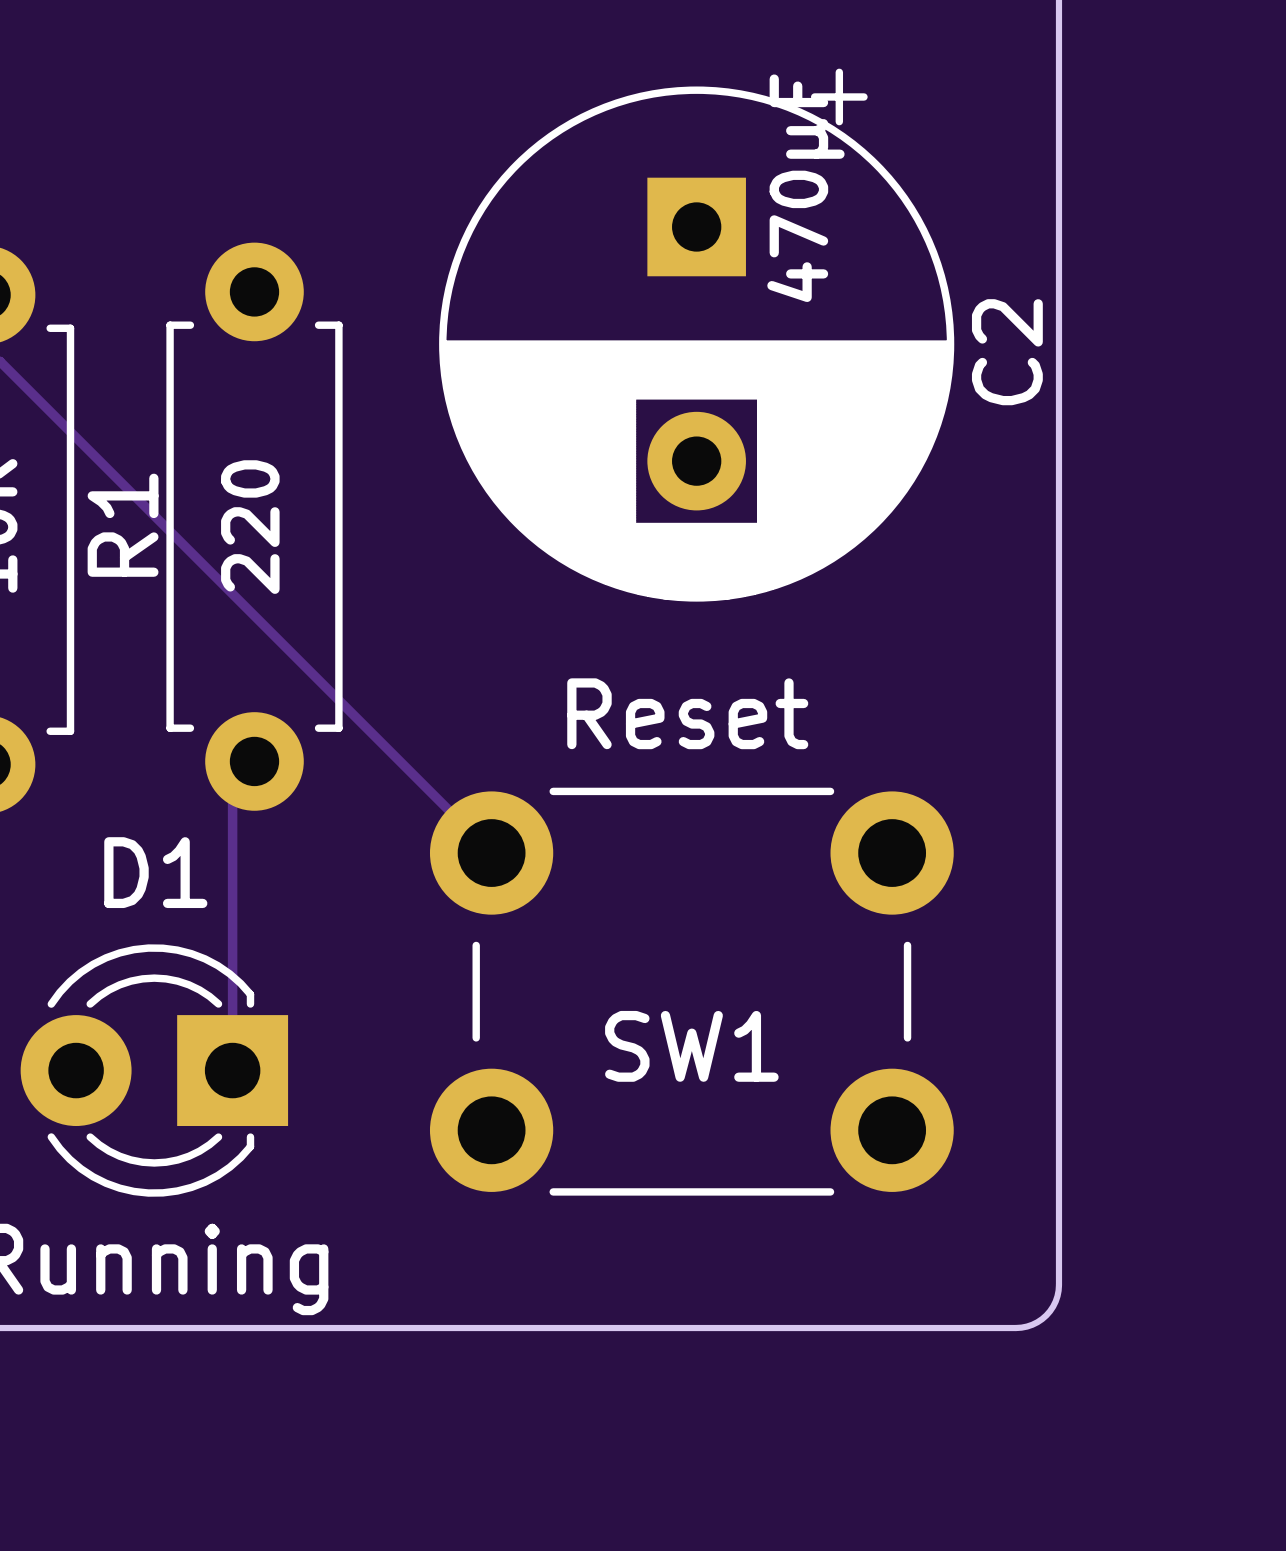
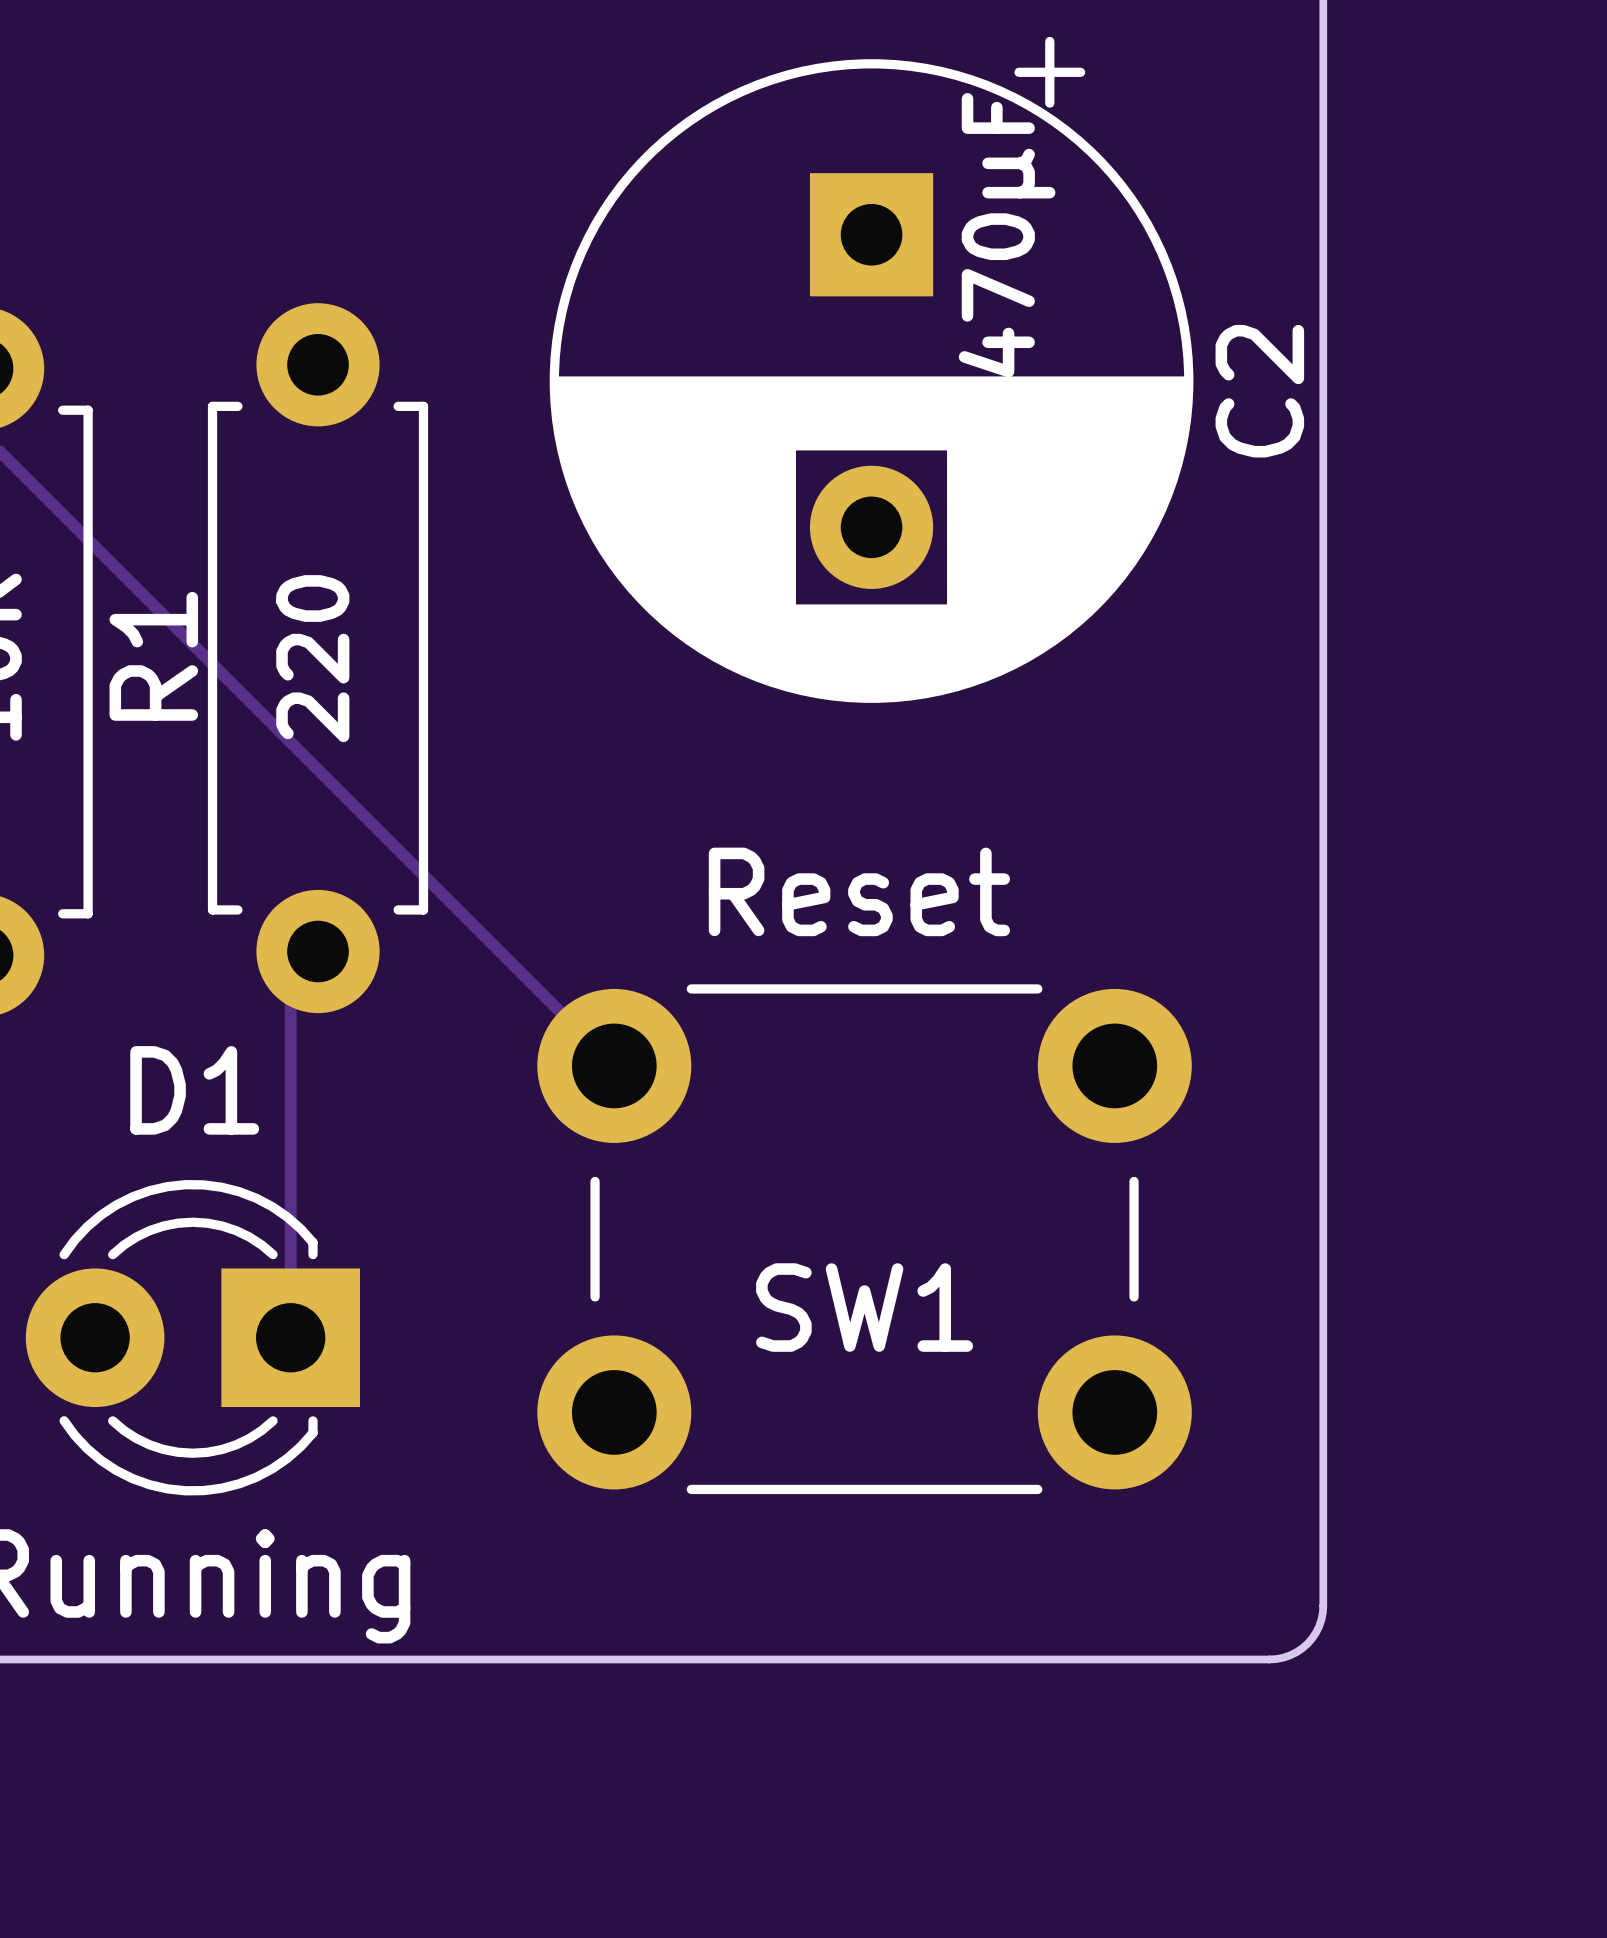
C2 position: (696, 335) -> (871, 369)

